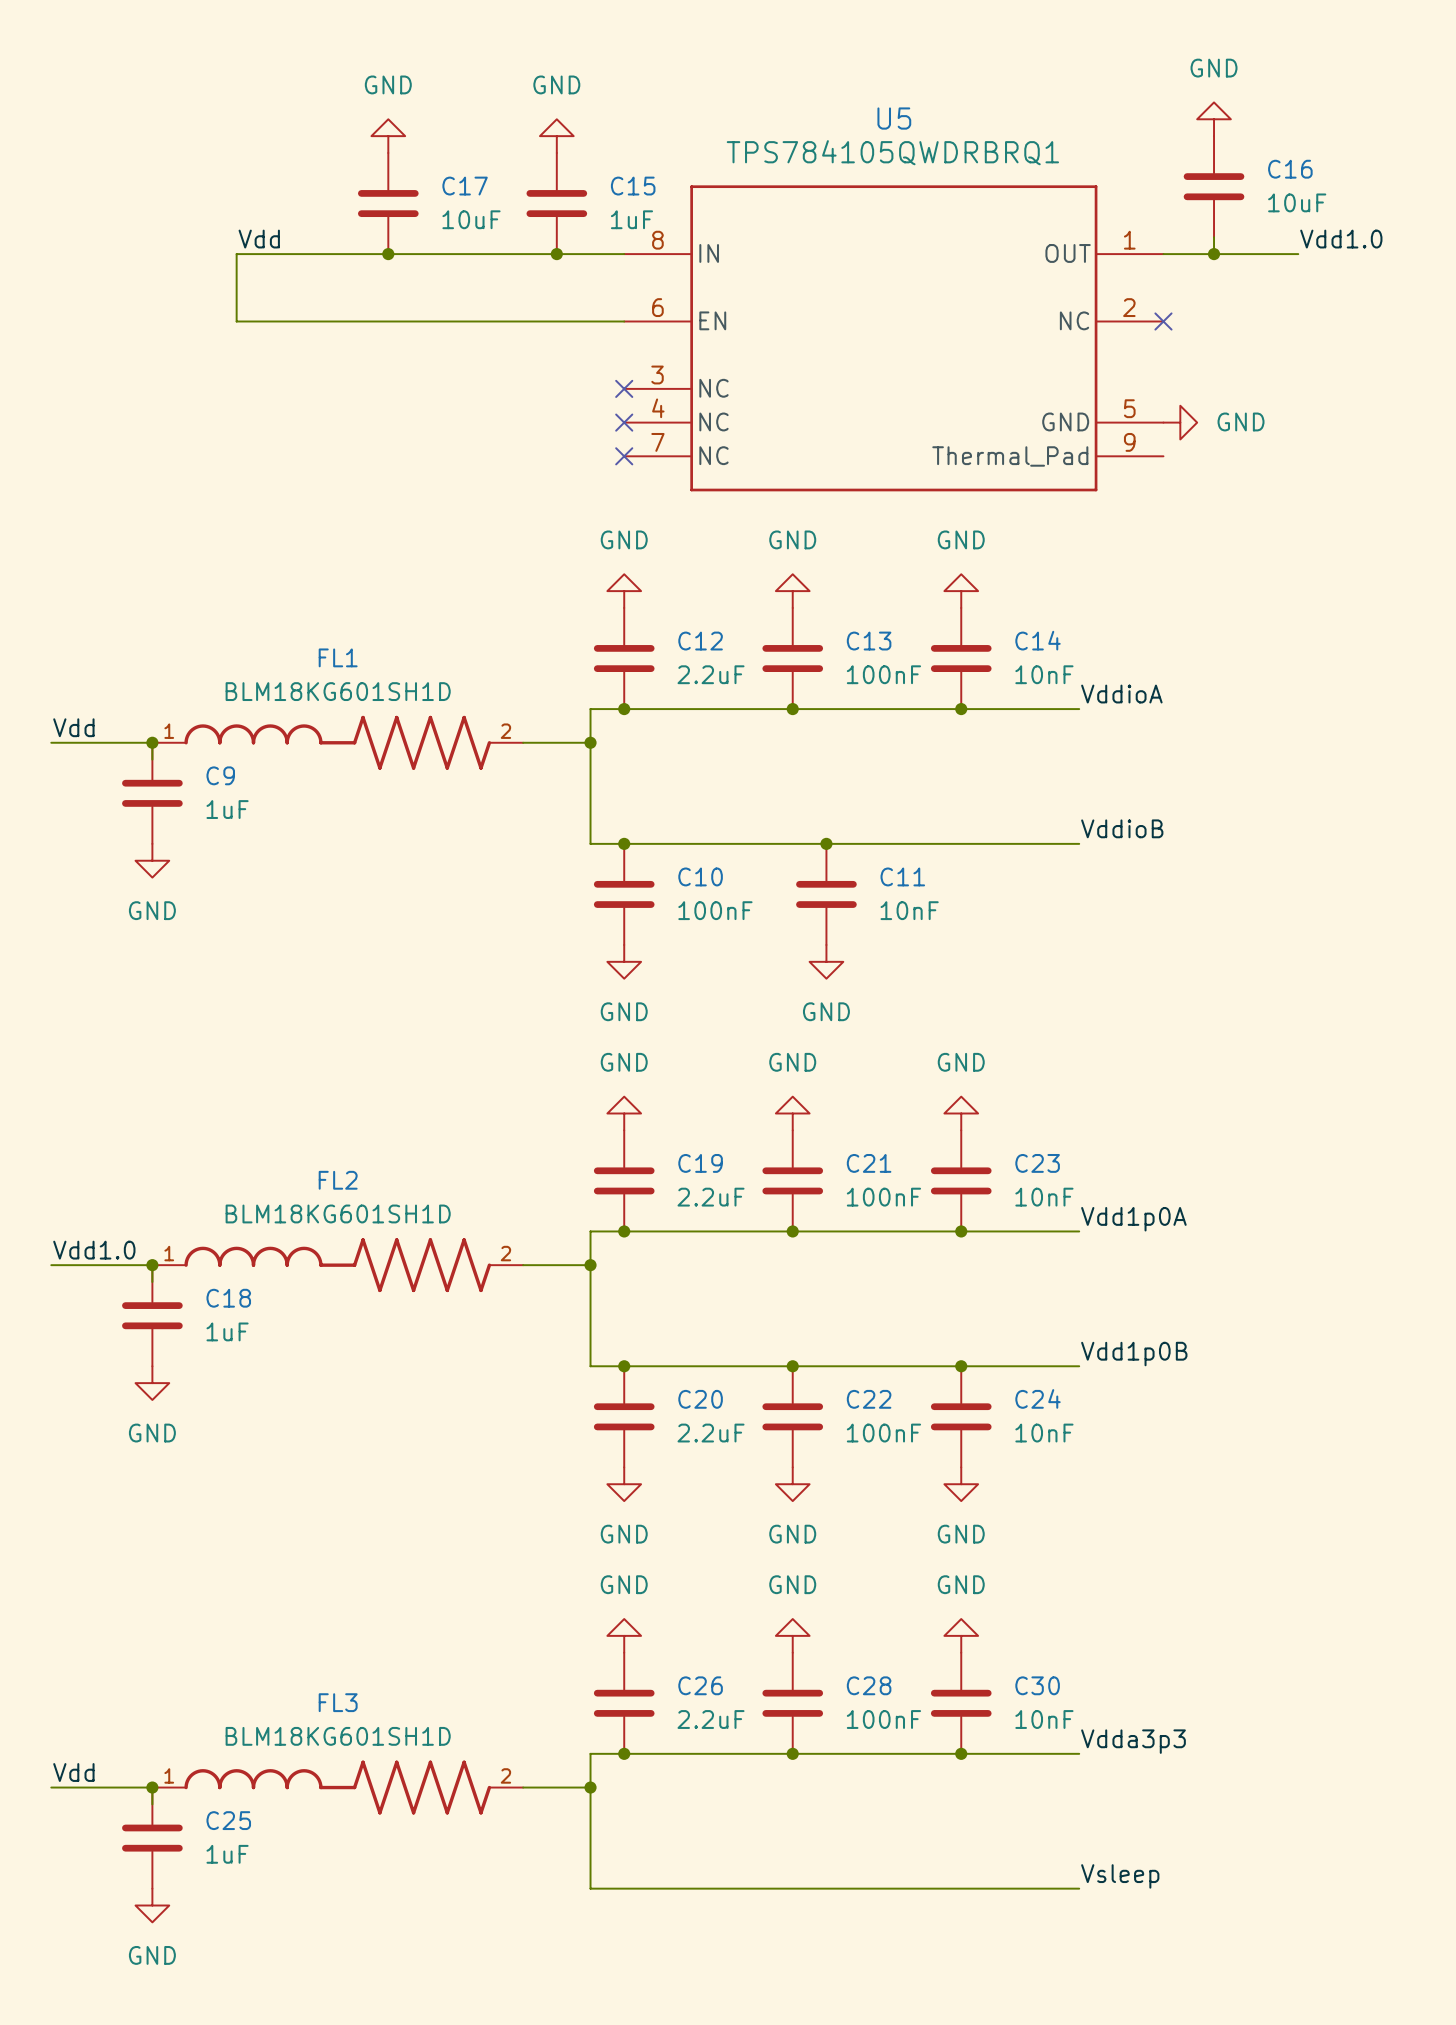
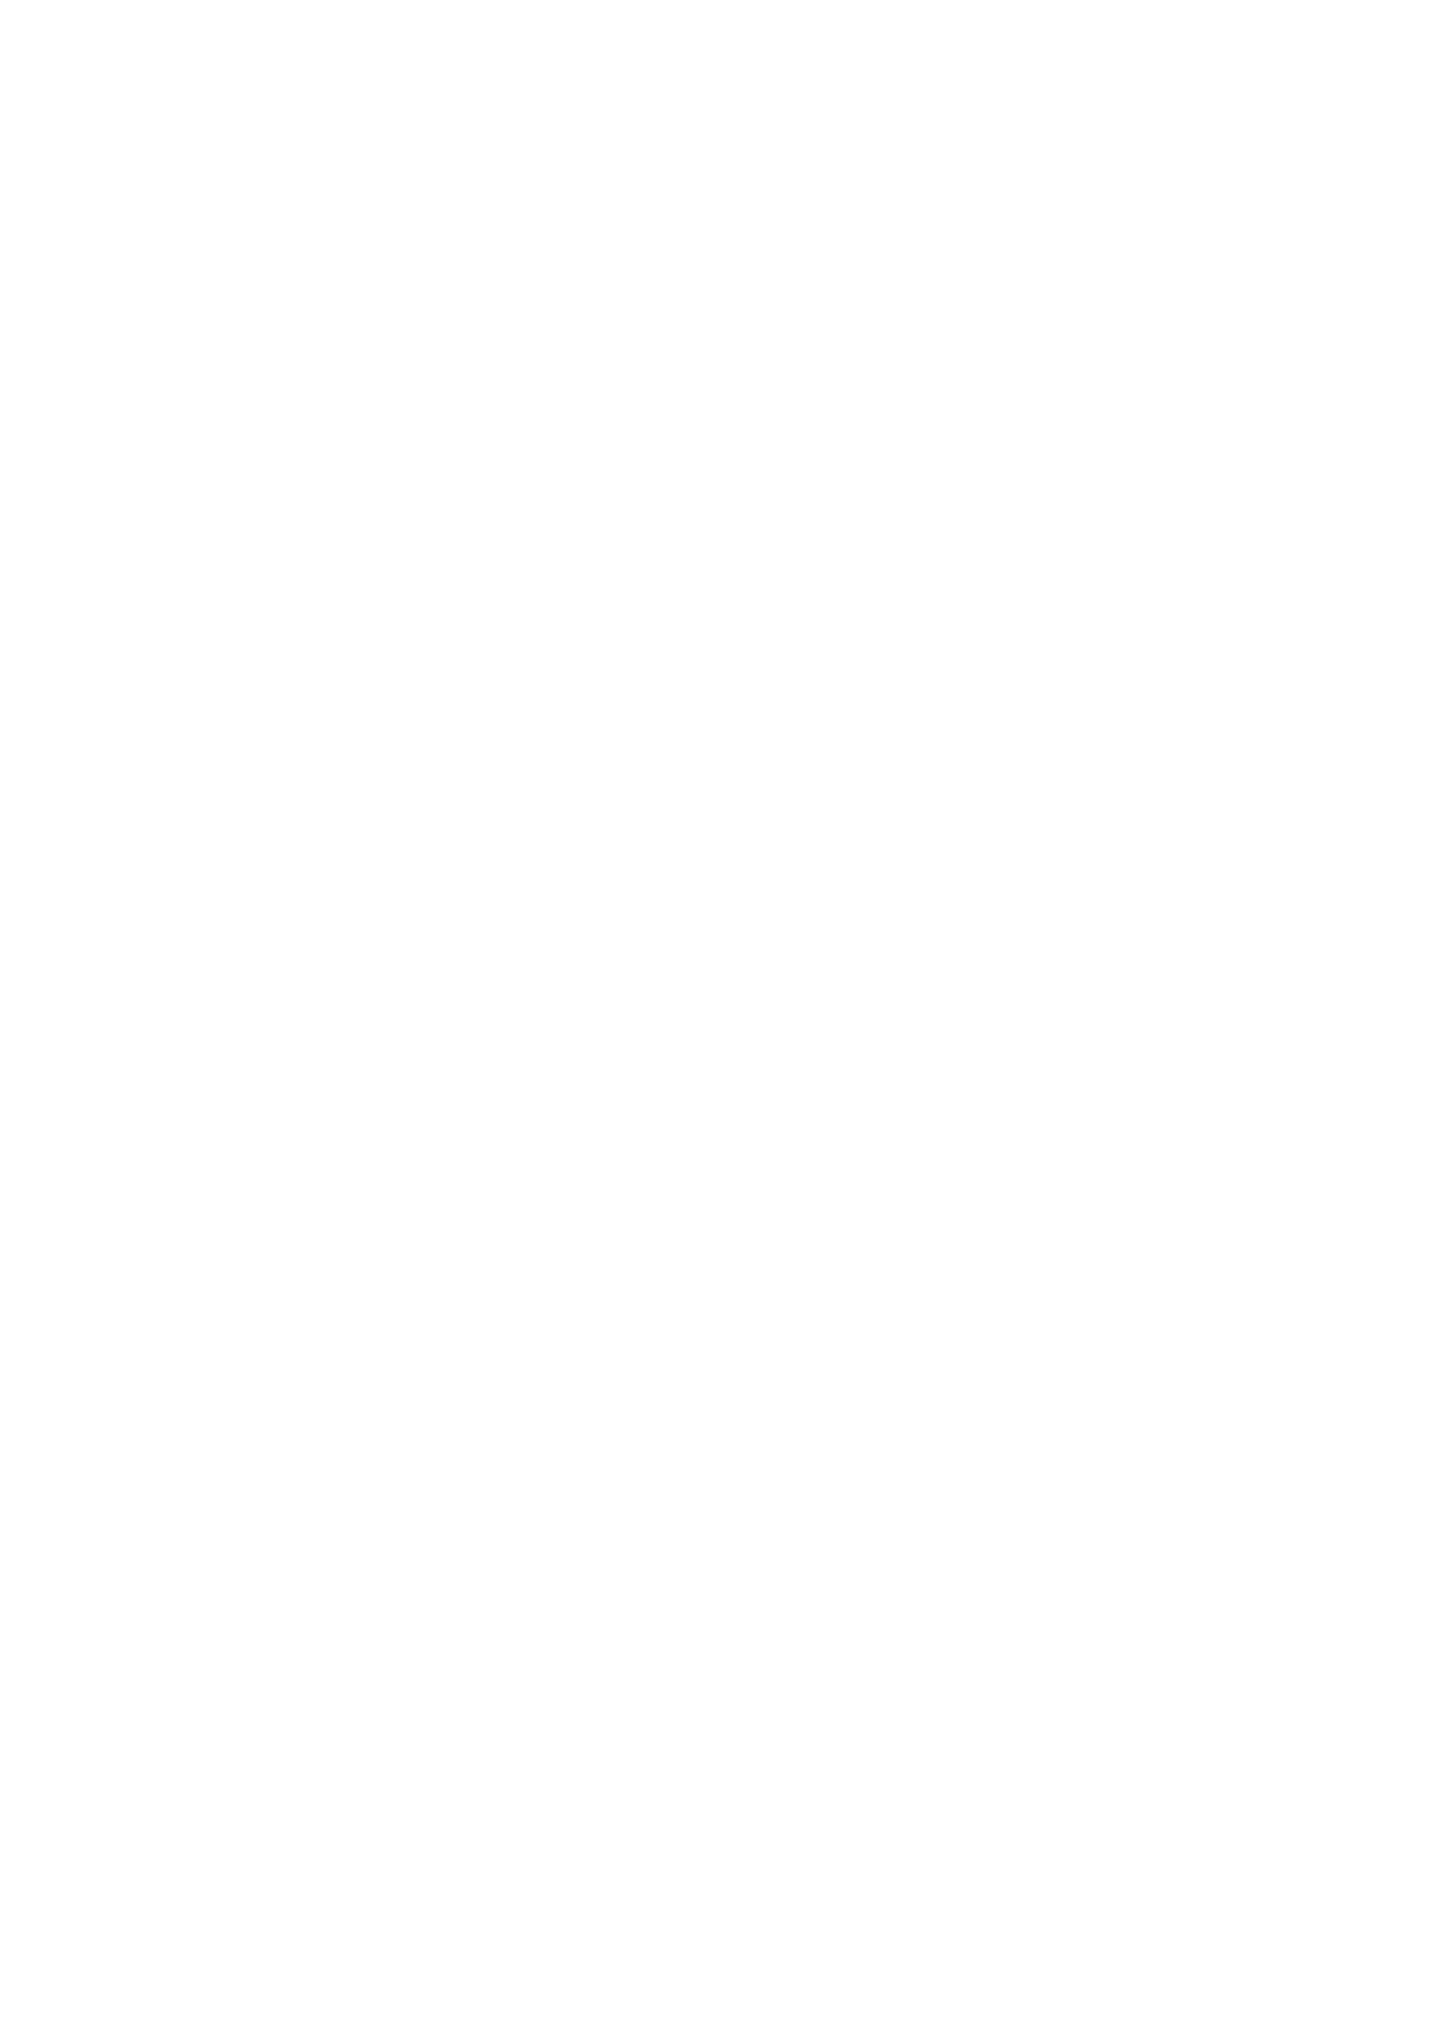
power symbol: GND (1214, 119) -> none
power symbol: GND (388, 136) -> none
power symbol: GND (556, 136) -> none
C16: 10uF (1214, 186) -> none
C17: 10uF (388, 203) -> none
C15: 1uF (556, 203) -> none
wire: (1214, 237) (1214, 254) -> none
label: Vdd (259, 239) -> none
label: Vdd1.0 (1341, 239) -> none
junction: (388, 254) -> none
junction: (556, 254) -> none
wire: (624, 254) (236, 254) (236, 321) (624, 321) -> none
wire: (1163, 254) (1298, 254) -> none
junction: (1214, 254) -> none
no-connect mark: (1163, 321) -> none
U5: TPS784105QWDRBRQ1 (893, 338) -> none
no-connect mark: (624, 388) -> none
no-connect mark: (624, 422) -> none
power symbol: GND (1180, 422) -> none
no-connect mark: (624, 456) -> none
power symbol: GND (624, 591) -> none
power symbol: GND (792, 591) -> none
power symbol: GND (961, 591) -> none
C12: 2.2uF (624, 658) -> none
C13: 100nF (792, 658) -> none
C14: 10nF (961, 658) -> none
label: VddioA (1121, 694) -> none
junction: (624, 709) -> none
junction: (792, 709) -> none
junction: (961, 709) -> none
wire: (1079, 709) (590, 709) (590, 843) (1079, 843) -> none
label: Vdd (73, 727) -> none
wire: (51, 742) (152, 742) (152, 759) -> none
junction: (152, 742) -> none
FL1: BLM18KG601SH1D (337, 742) -> none
wire: (523, 742) (590, 742) -> none
junction: (590, 742) -> none
C9: 1uF (152, 793) -> none
label: VddioB (1122, 828) -> none
junction: (624, 843) -> none
junction: (826, 843) -> none
power symbol: GND (152, 860) -> none
C10: 100nF (624, 894) -> none
C11: 10nF (826, 894) -> none
power symbol: GND (624, 961) -> none
power symbol: GND (826, 961) -> none
power symbol: GND (624, 1113) -> none
power symbol: GND (792, 1113) -> none
power symbol: GND (961, 1113) -> none
C19: 2.2uF (624, 1180) -> none
C21: 100nF (792, 1180) -> none
C23: 10nF (961, 1180) -> none
label: Vdd1p0A (1133, 1219) -> none
junction: (624, 1231) -> none
junction: (792, 1231) -> none
junction: (961, 1231) -> none
wire: (1079, 1231) (590, 1231) (590, 1366) (1079, 1366) -> none
label: Vdd1.0 (94, 1250) -> none
wire: (51, 1265) (152, 1265) (152, 1282) -> none
junction: (152, 1265) -> none
FL2: BLM18KG601SH1D (337, 1265) -> none
wire: (523, 1265) (590, 1265) -> none
junction: (590, 1265) -> none
C18: 1uF (152, 1315) -> none
label: Vdd1p0B (1134, 1354) -> none
junction: (624, 1366) -> none
junction: (792, 1366) -> none
junction: (961, 1366) -> none
power symbol: GND (152, 1383) -> none
C20: 2.2uF (624, 1416) -> none
C22: 100nF (792, 1416) -> none
C24: 10nF (961, 1416) -> none
power symbol: GND (624, 1484) -> none
power symbol: GND (792, 1484) -> none
power symbol: GND (961, 1484) -> none
power symbol: GND (624, 1635) -> none
power symbol: GND (792, 1635) -> none
power symbol: GND (961, 1635) -> none
C26: 2.2uF (624, 1703) -> none
C28: 100nF (792, 1703) -> none
C30: 10nF (961, 1703) -> none
label: Vdda3p3 (1133, 1741) -> none
junction: (624, 1753) -> none
junction: (792, 1753) -> none
junction: (961, 1753) -> none
wire: (1079, 1753) (590, 1753) (590, 1888) (1079, 1888) -> none
label: Vdd (73, 1772) -> none
wire: (51, 1787) (152, 1787) (152, 1804) -> none
junction: (152, 1787) -> none
FL3: BLM18KG601SH1D (337, 1787) -> none
wire: (523, 1787) (590, 1787) -> none
junction: (590, 1787) -> none
C25: 1uF (152, 1838) -> none
label: Vsleep (1120, 1876) -> none
power symbol: GND (152, 1905) -> none

